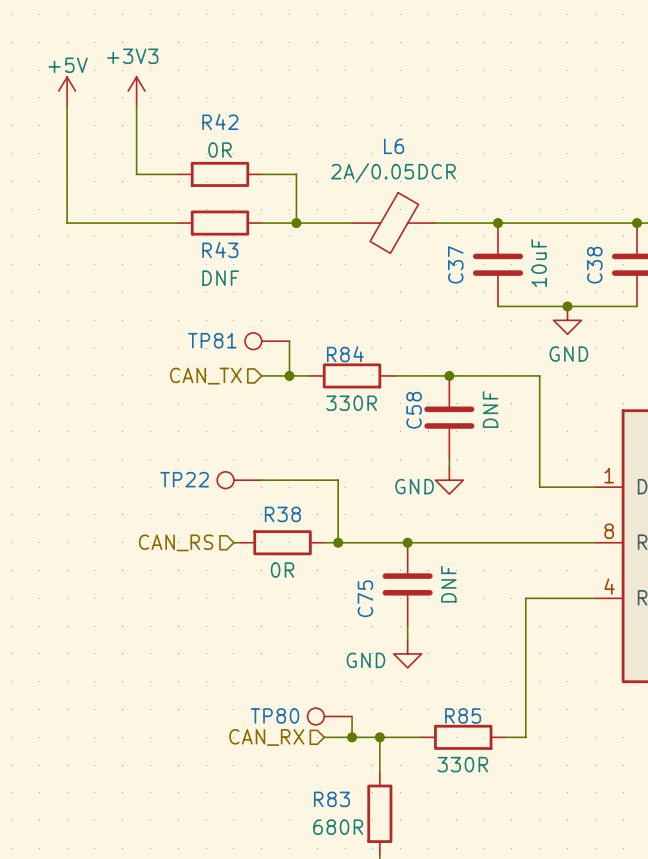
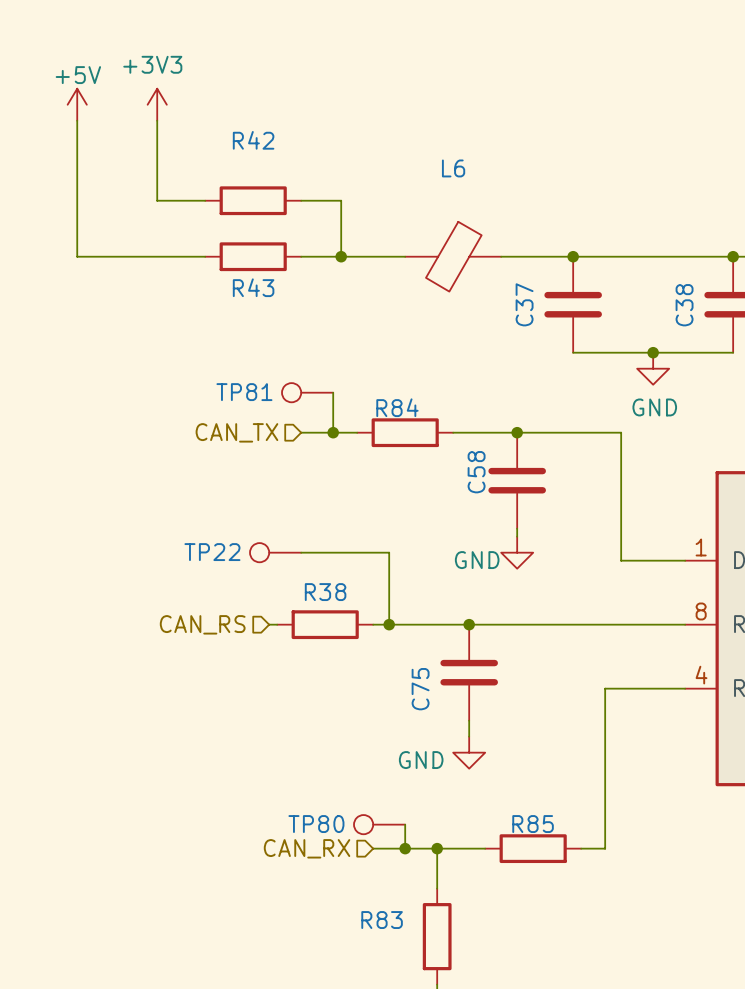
R42 value: 0R (220, 150) -> none
L6 value: 2A/0.05DCR (393, 172) -> none
C37 value: 10uF (539, 263) -> none
R43 value: DNF (220, 278) -> none
R84 value: 330R (351, 403) -> none
C58 value: DNF (490, 409) -> none
R38 value: 0R (282, 570) -> none
C75 value: DNF (448, 584) -> none
R85 value: 330R (462, 764) -> none
R83 value: 680R (338, 827) -> none

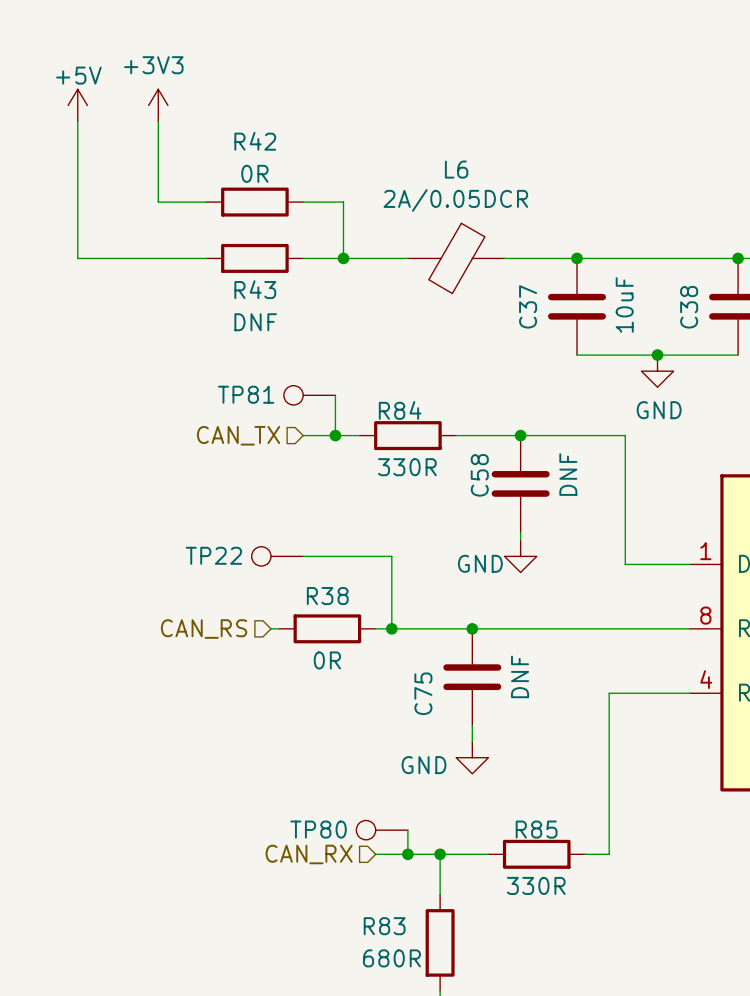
R42 value: none -> 0R (254, 173)
L6 value: none -> 2A/0.05DCR (455, 200)
C37 value: none -> 10uF (624, 304)
R43 value: none -> DNF (255, 322)
R84 value: none -> 330R (407, 467)
C58 value: none -> DNF (568, 474)
R38 value: none -> 0R (327, 660)
C75 value: none -> DNF (520, 676)
R85 value: none -> 330R (536, 885)
R83 value: none -> 680R (391, 958)

